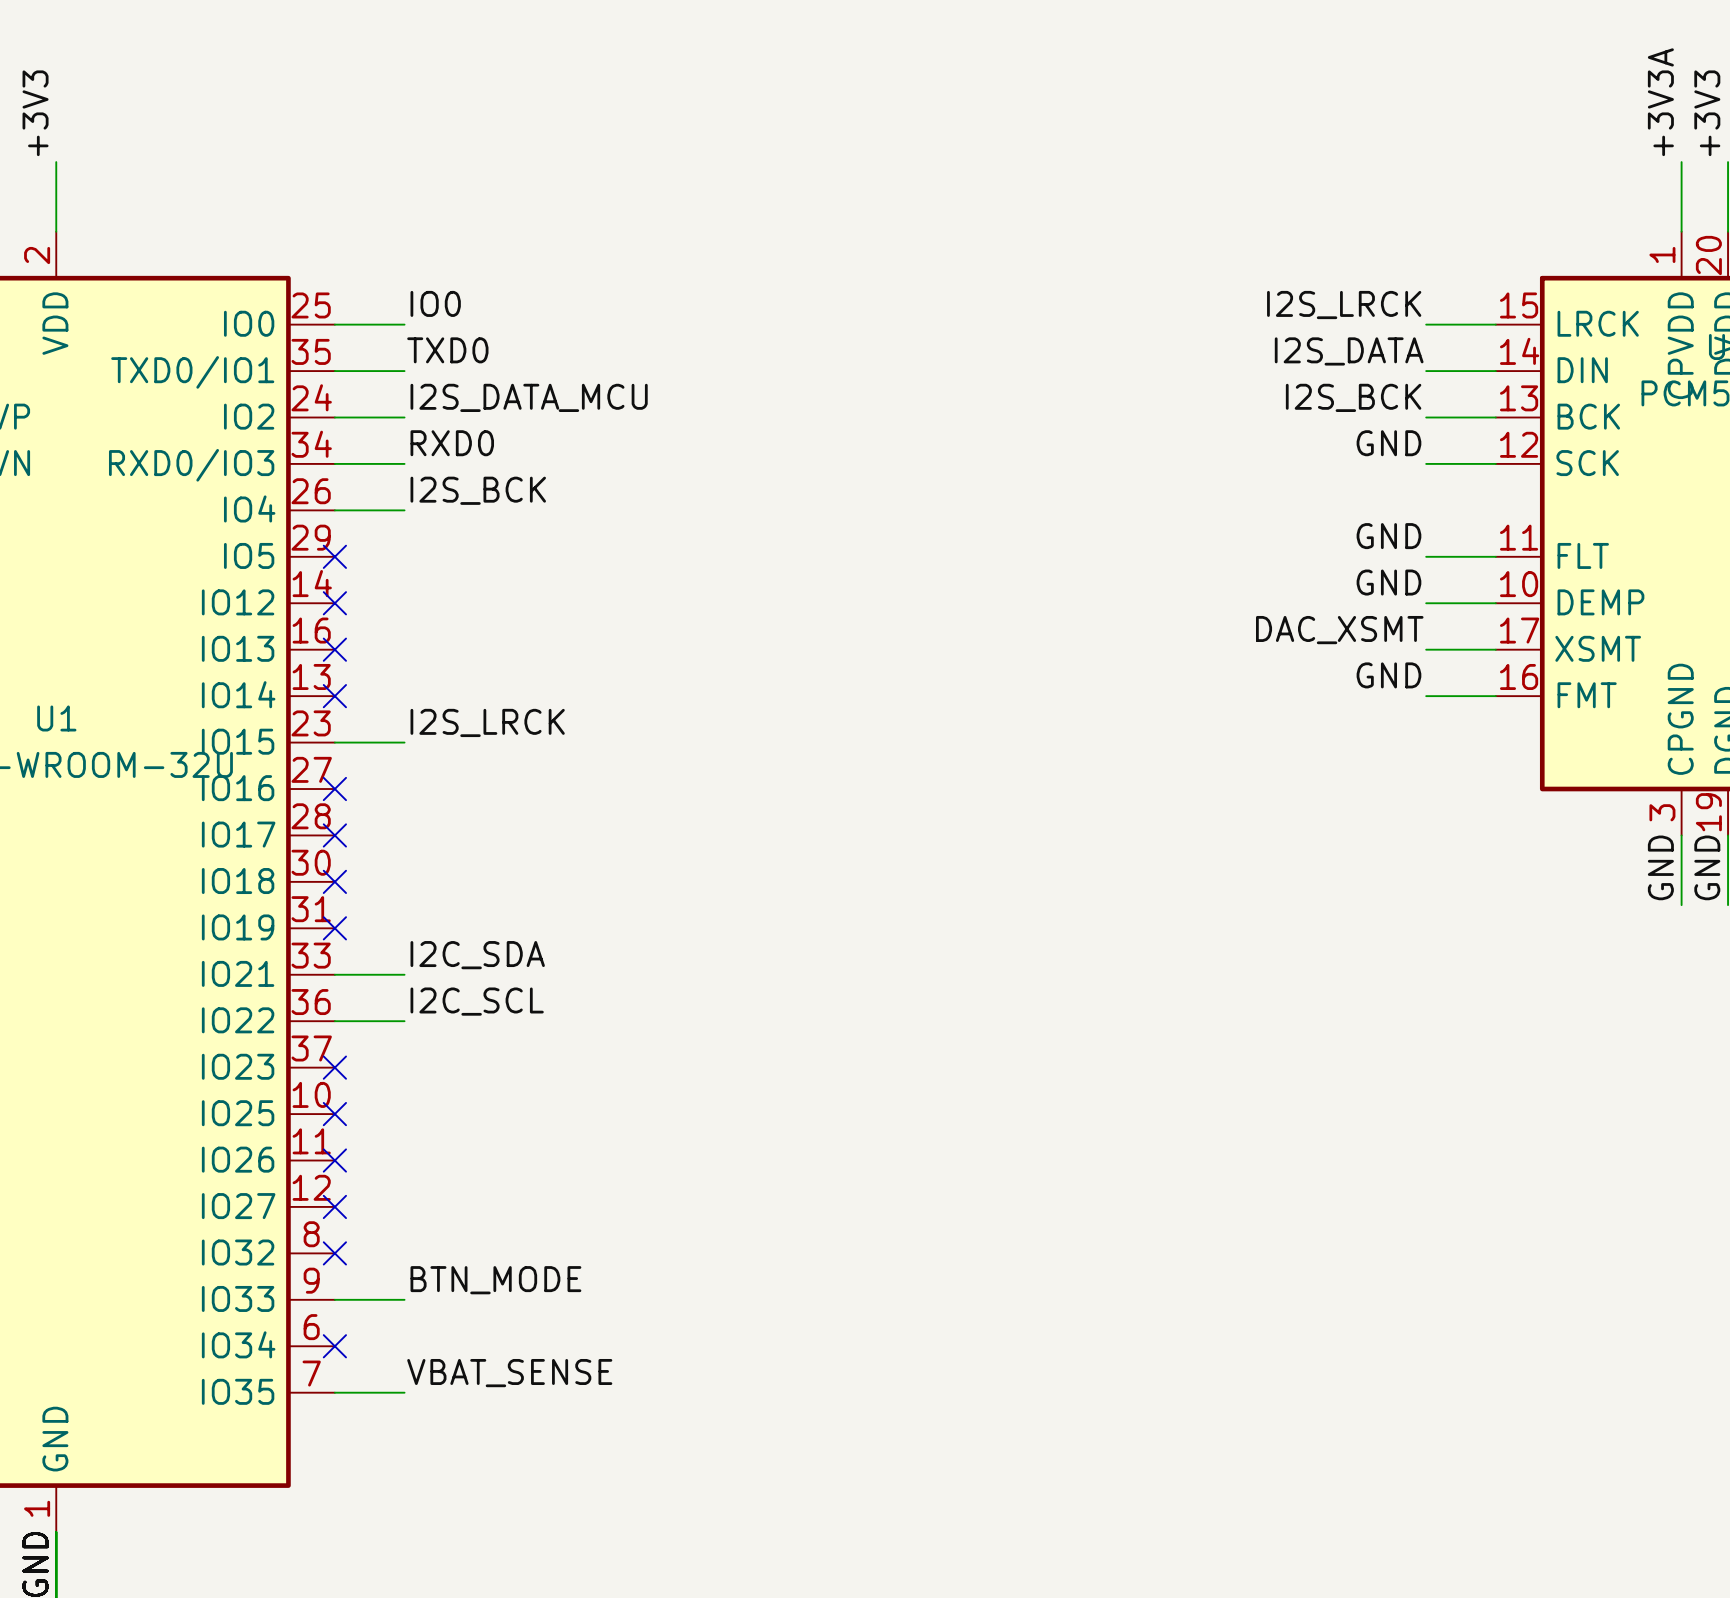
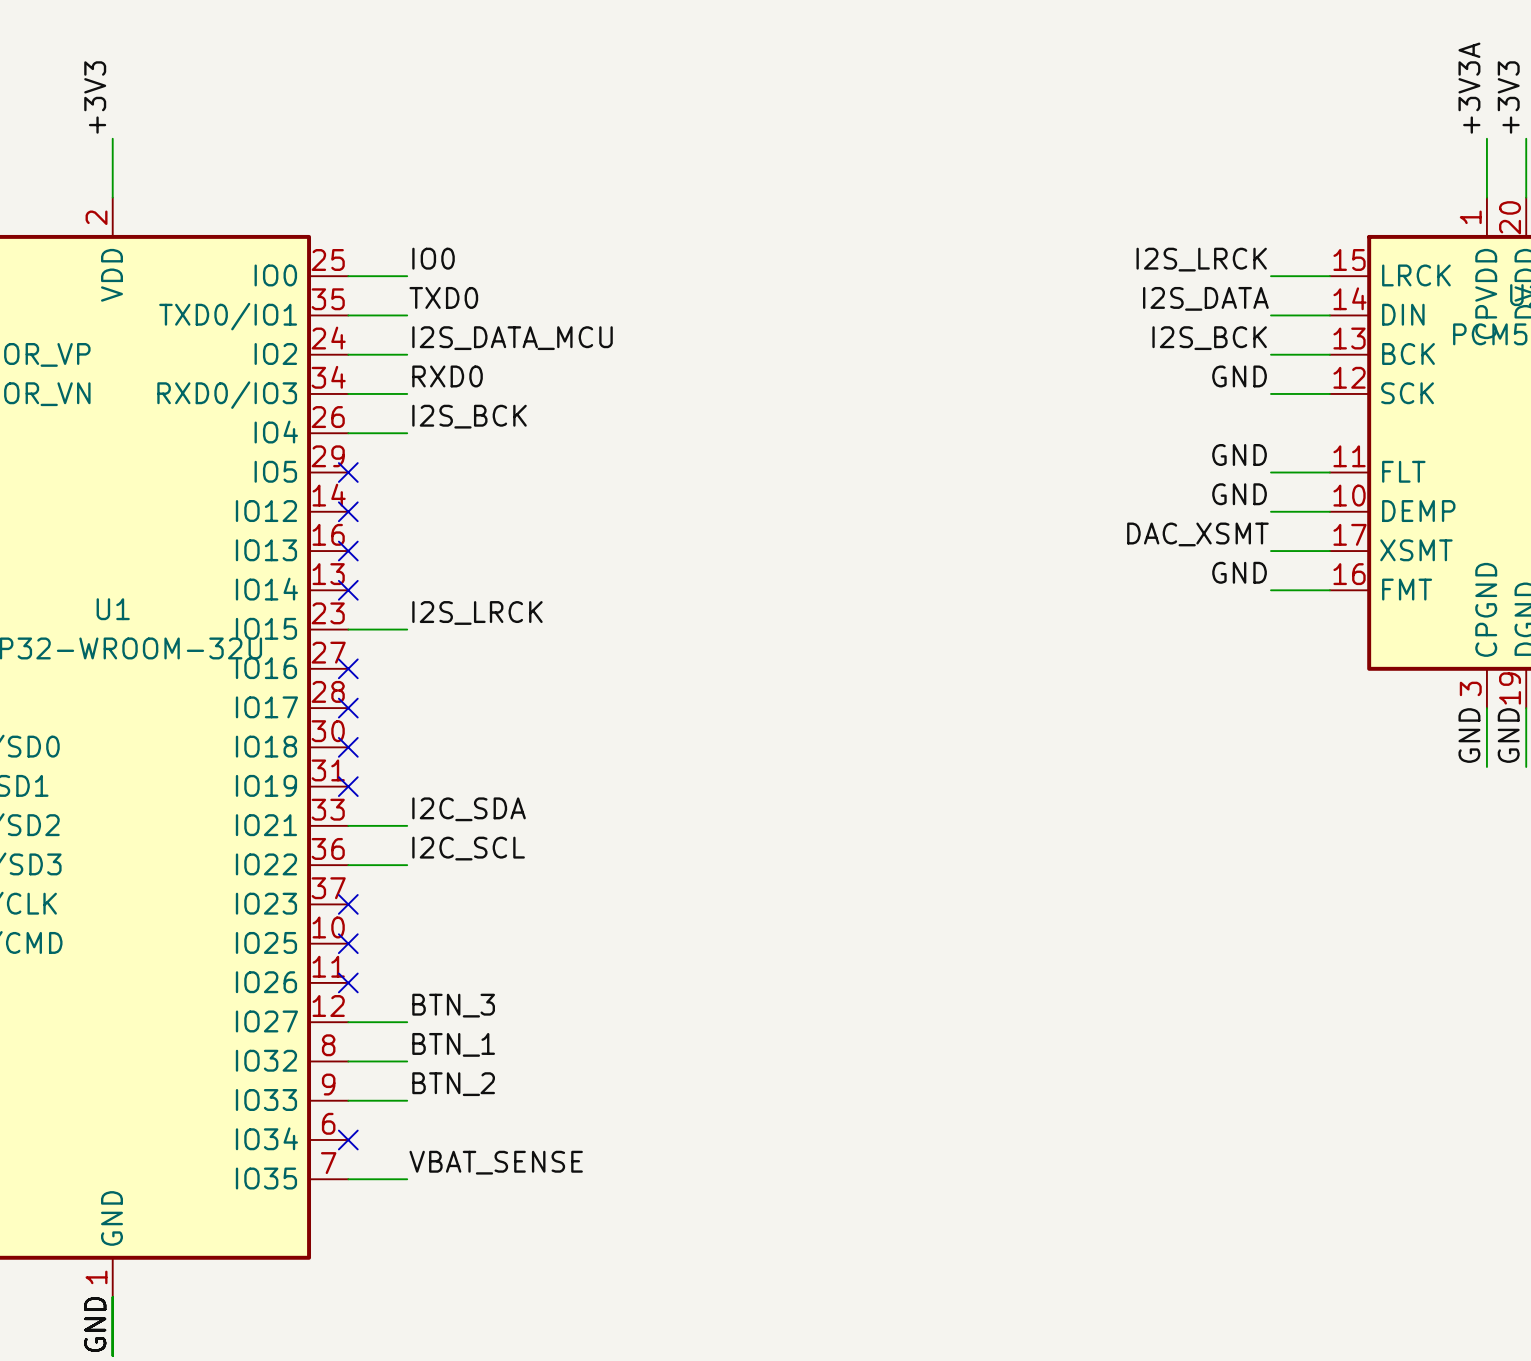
label: none -> BTN_3 (453, 1005)
wire: none -> (348, 1022) (407, 1022)
no-connect mark: (334, 1206) -> none
label: none -> BTN_1 (453, 1044)
wire: none -> (348, 1061) (407, 1061)
no-connect mark: (334, 1253) -> none
label: BTN_MODE (495, 1280) -> BTN_2 (453, 1084)

